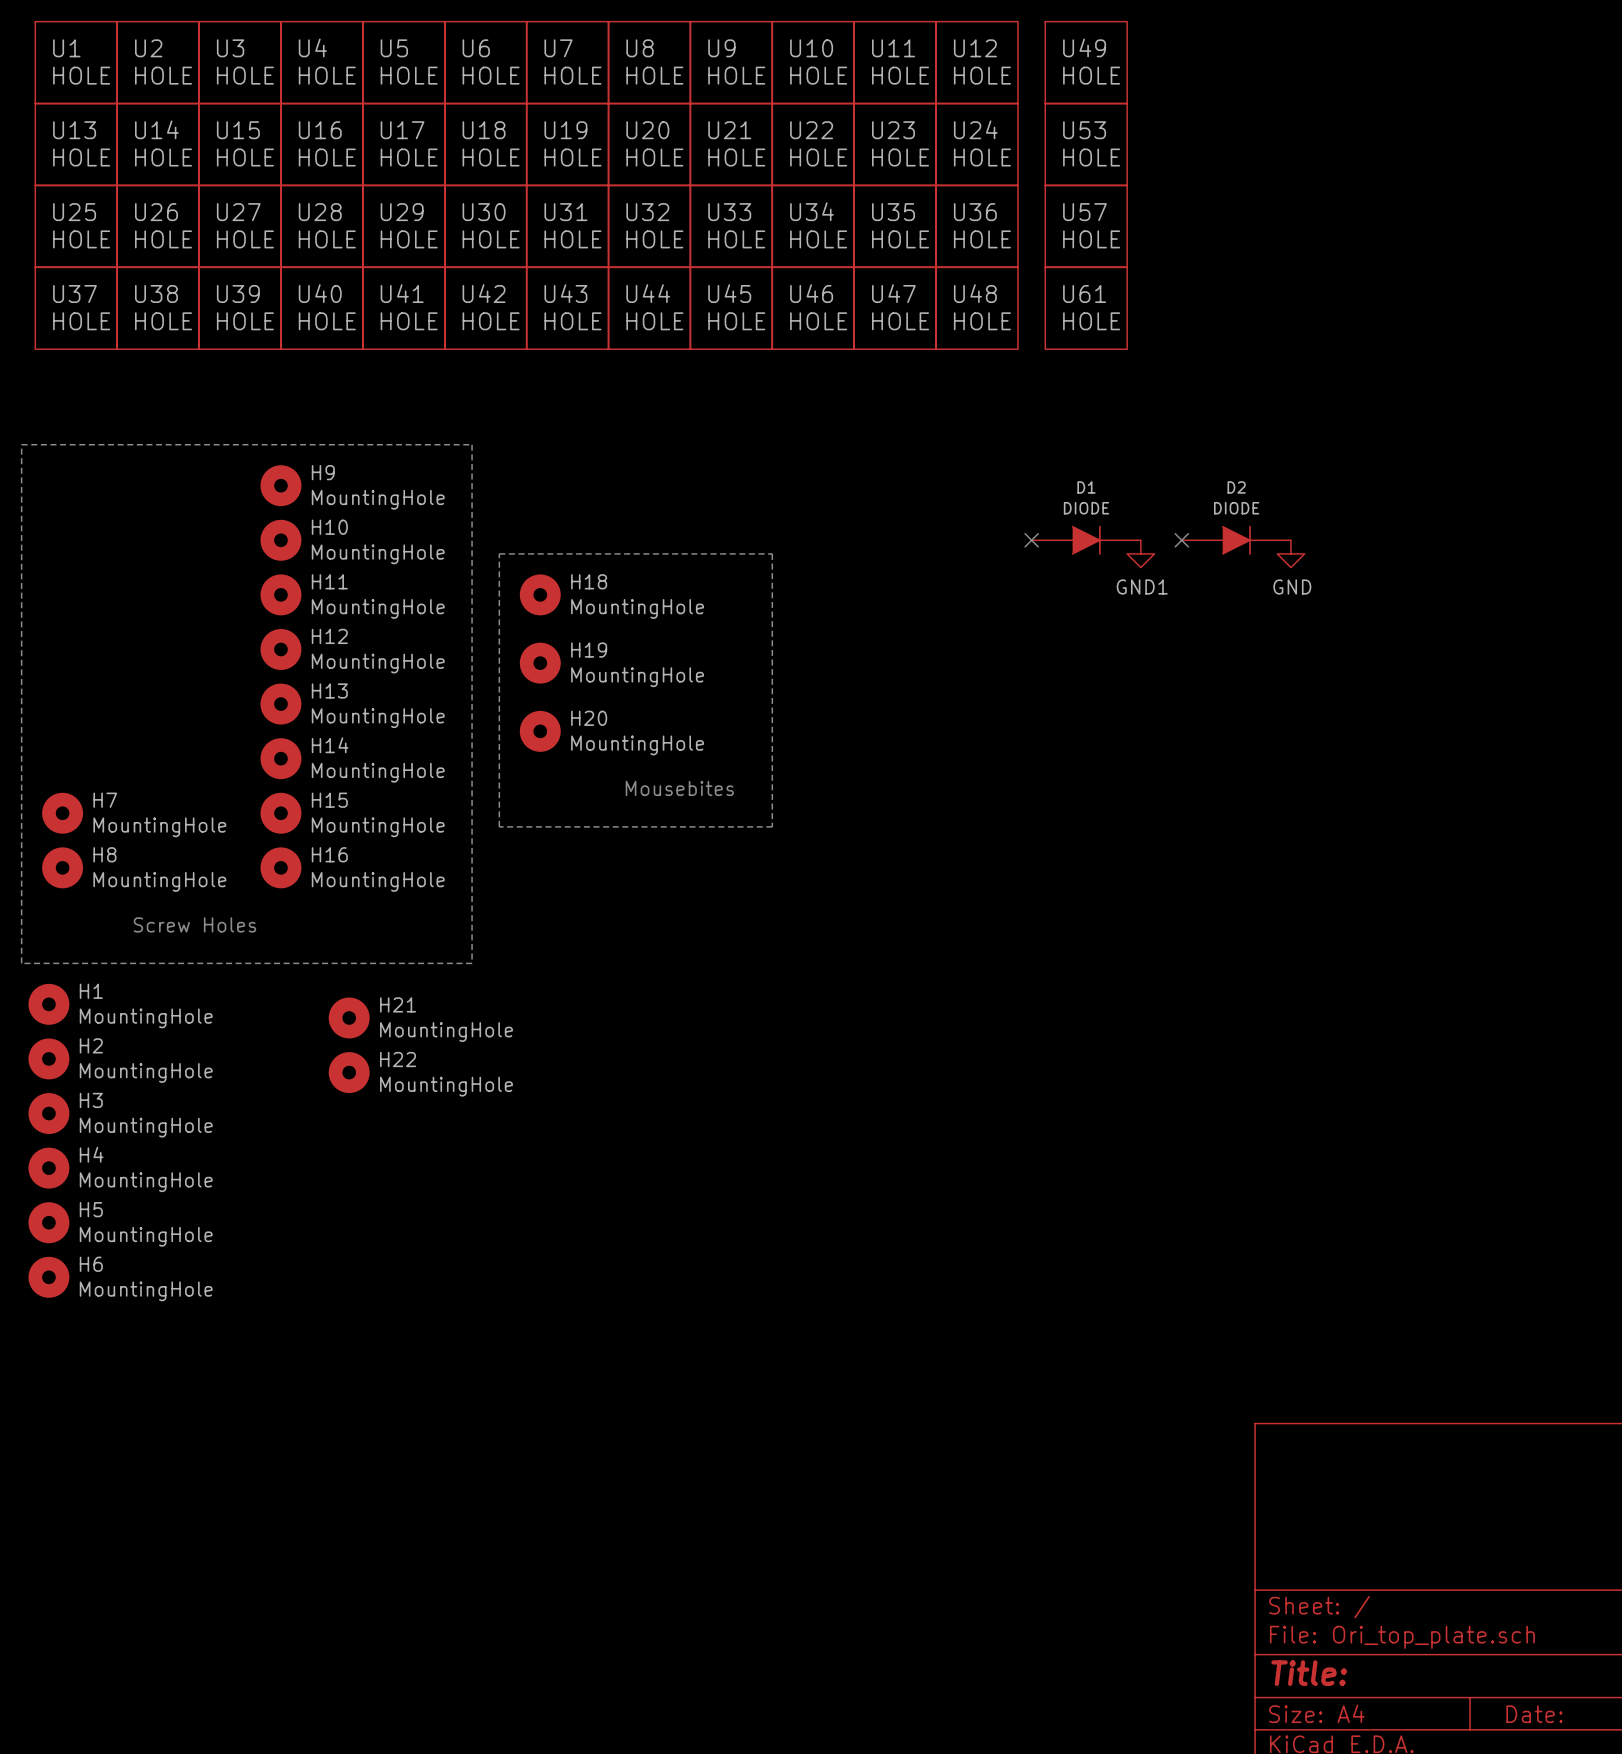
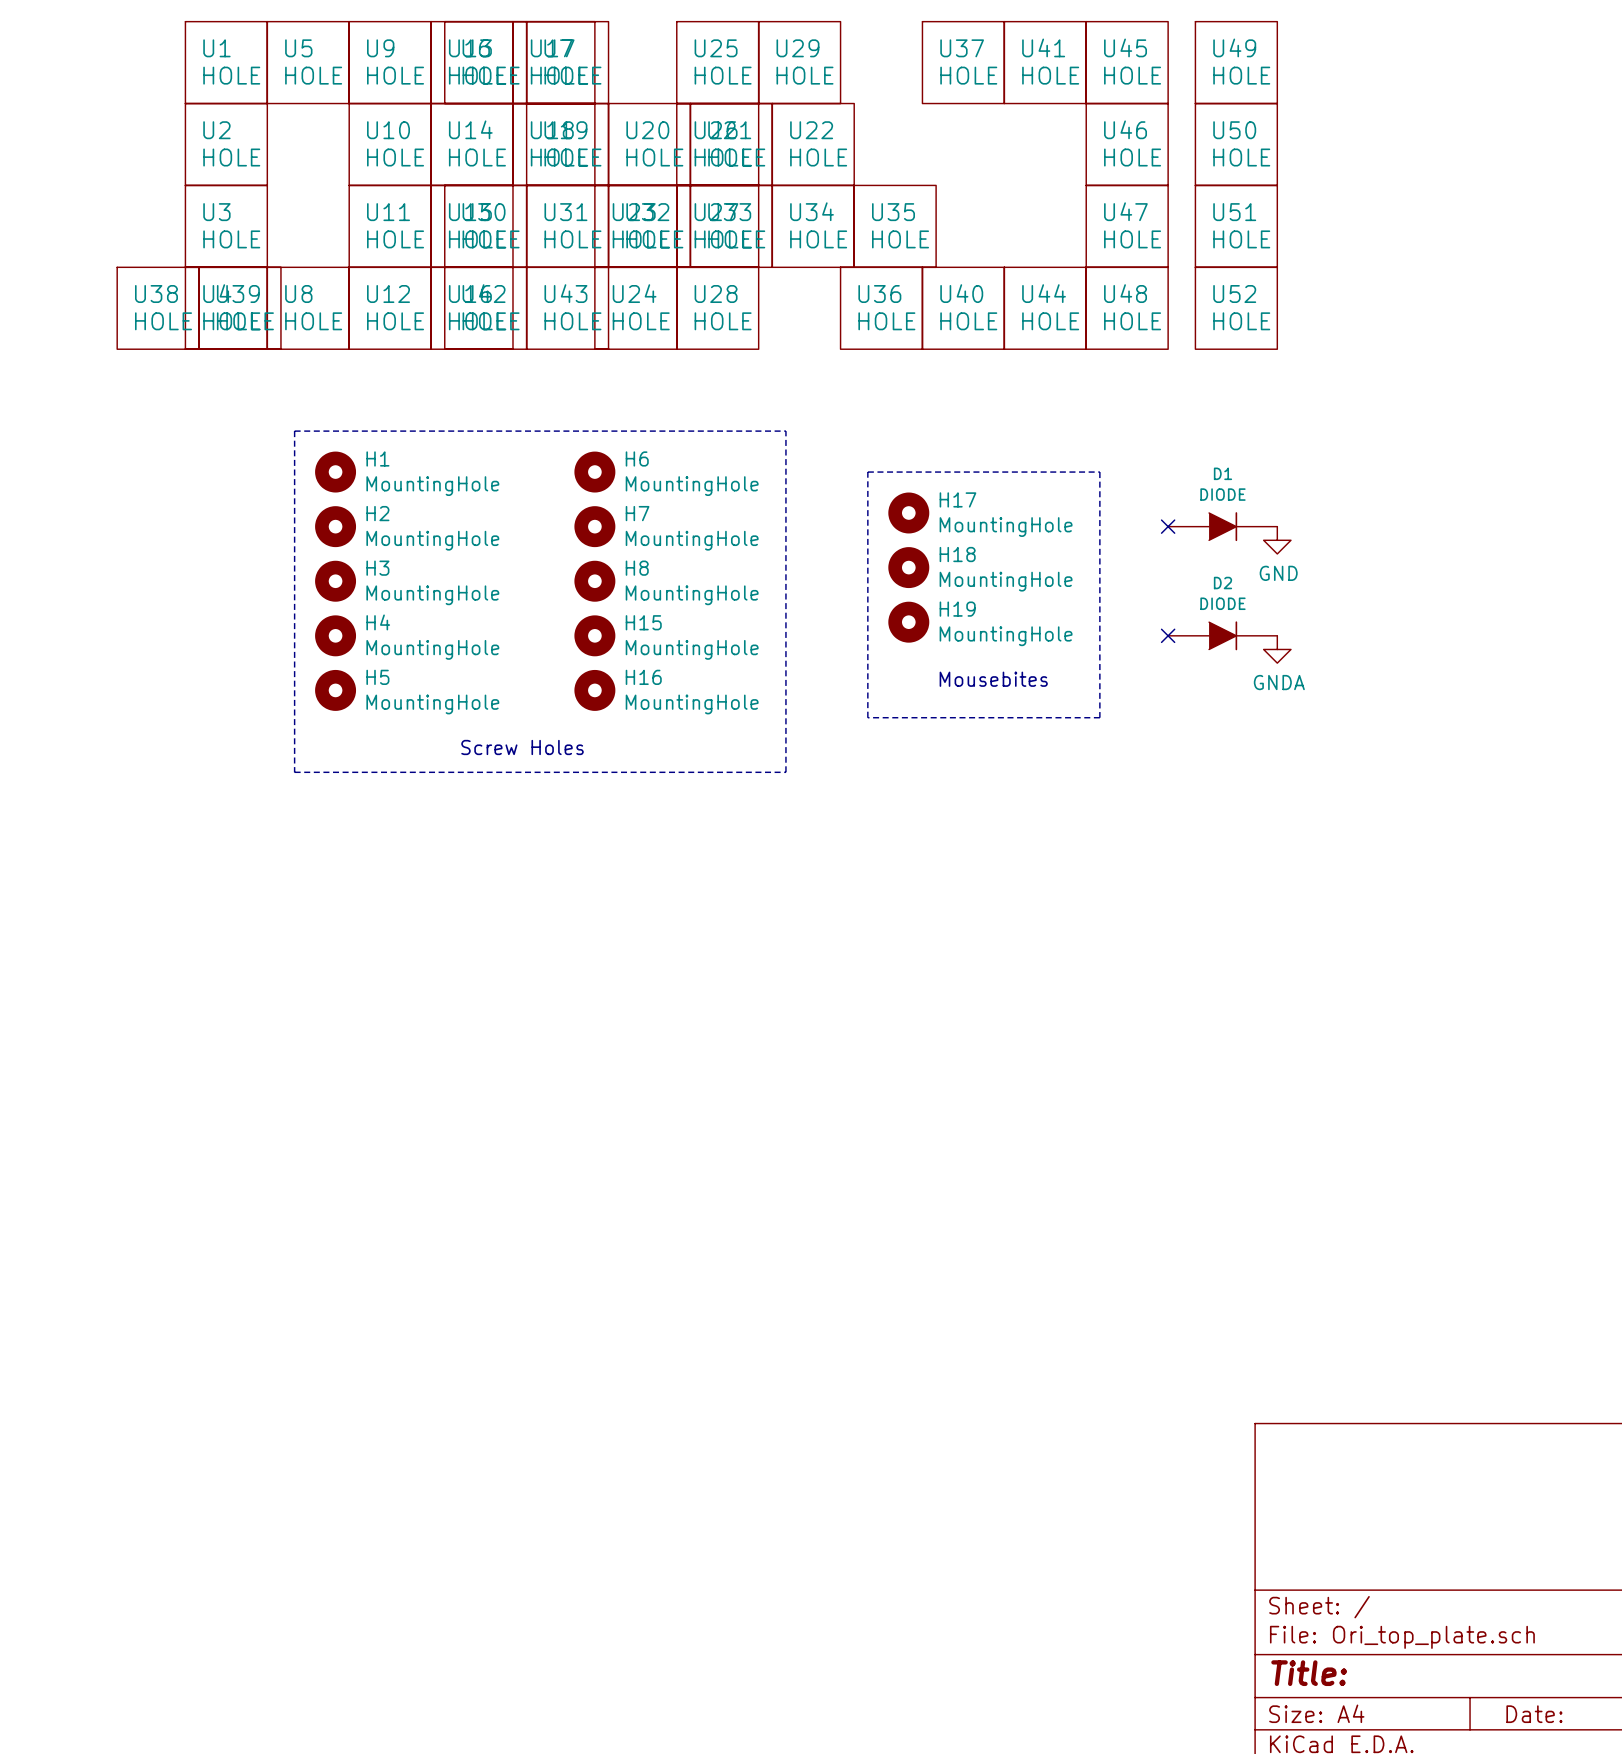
U1 position: (76, 62) -> (226, 62)
U2 position: (158, 62) -> (226, 144)
U3 position: (240, 62) -> (226, 226)
U4 position: (321, 62) -> (226, 308)
U5 position: (403, 62) -> (308, 62)
U8 position: (649, 62) -> (308, 308)
U9 position: (731, 62) -> (390, 62)
U10 position: (813, 62) -> (390, 144)
U11 position: (895, 62) -> (390, 226)
U12 position: (977, 62) -> (390, 308)
U49 position: (1086, 62) -> (1236, 62)
U13 position: (76, 144) -> (472, 62)
U14 position: (158, 144) -> (472, 144)
U15 position: (240, 144) -> (472, 226)
U16 position: (321, 144) -> (472, 308)
U17 position: (403, 144) -> (553, 62)
U18 position: (485, 144) -> (553, 144)
U23 position: (895, 144) -> (635, 226)
U24 position: (977, 144) -> (635, 308)
U53: HOLE (1086, 144) -> none
U50: none -> HOLE (1236, 144)
U25 position: (76, 226) -> (717, 62)
U26 position: (158, 226) -> (717, 144)
U27 position: (240, 226) -> (717, 226)
U28 position: (321, 226) -> (717, 308)
U29 position: (403, 226) -> (799, 62)
U36 position: (977, 226) -> (881, 308)
U57: HOLE (1086, 226) -> none
U51: none -> HOLE (1236, 226)
U37 position: (76, 308) -> (963, 62)
U40 position: (321, 308) -> (963, 308)
U41 position: (403, 308) -> (1045, 62)
U44 position: (649, 308) -> (1045, 308)
U45 position: (731, 308) -> (1127, 62)
U46 position: (813, 308) -> (1127, 144)
U47 position: (895, 308) -> (1127, 226)
U48 position: (977, 308) -> (1127, 308)
U61: HOLE (1086, 308) -> none
U52: none -> HOLE (1236, 308)
line: none -> (294, 431) (785, 431) (785, 772) (294, 772) (294, 431)
line: (21, 444) (472, 444) (472, 963) (21, 963) (21, 444) -> none
line: none -> (867, 472) (1099, 472) (1099, 717) (867, 717) (867, 472)
H9: MountingHole (280, 485) -> none
H17: none -> MountingHole (908, 512)
H10: MountingHole (280, 540) -> none
no-connect mark: (1031, 540) -> none
D1 position: (1086, 540) -> (1222, 526)
no-connect mark position: (1181, 540) -> (1168, 526)
D2 position: (1236, 540) -> (1222, 635)
line: (499, 553) (499, 826) (772, 826) (772, 553) (499, 553) -> none
power symbol: GND1 (1140, 553) -> none
power symbol position: GND (1290, 553) -> GND (1277, 540)
H11: MountingHole (280, 594) -> none
H18 position: (540, 594) -> (908, 567)
no-connect mark: none -> (1168, 635)
H12: MountingHole (280, 649) -> none
power symbol: none -> GNDA (1277, 649)
H19 position: (540, 663) -> (908, 622)
text: none -> Mousebites (993, 679)
H13: MountingHole (280, 704) -> none
H20: MountingHole (540, 731) -> none
text: none -> Screw Holes (522, 747)
H14: MountingHole (280, 758) -> none
text: Mousebites (679, 788) -> none
H7 position: (62, 813) -> (594, 526)
H15 position: (280, 813) -> (594, 635)
H8 position: (62, 867) -> (594, 581)
H16 position: (280, 867) -> (594, 690)
text: Screw Holes (194, 924) -> none
H1 position: (48, 1004) -> (335, 472)
H21: MountingHole (349, 1017) -> none
H2 position: (48, 1058) -> (335, 526)
H22: MountingHole (349, 1072) -> none
H3 position: (48, 1113) -> (335, 581)
H4 position: (48, 1168) -> (335, 635)
H5 position: (48, 1222) -> (335, 690)
H6 position: (48, 1277) -> (594, 472)

